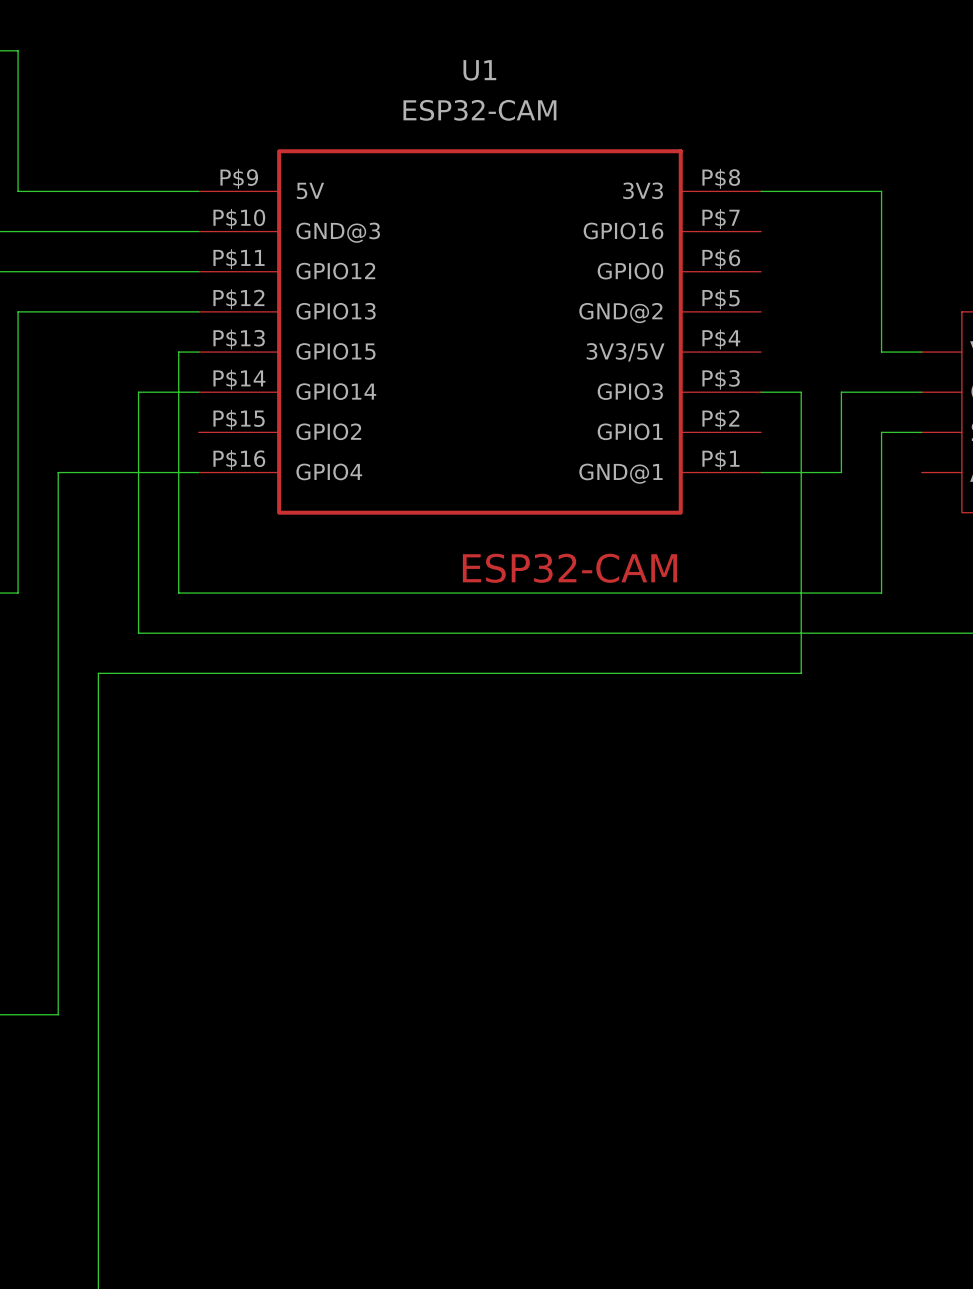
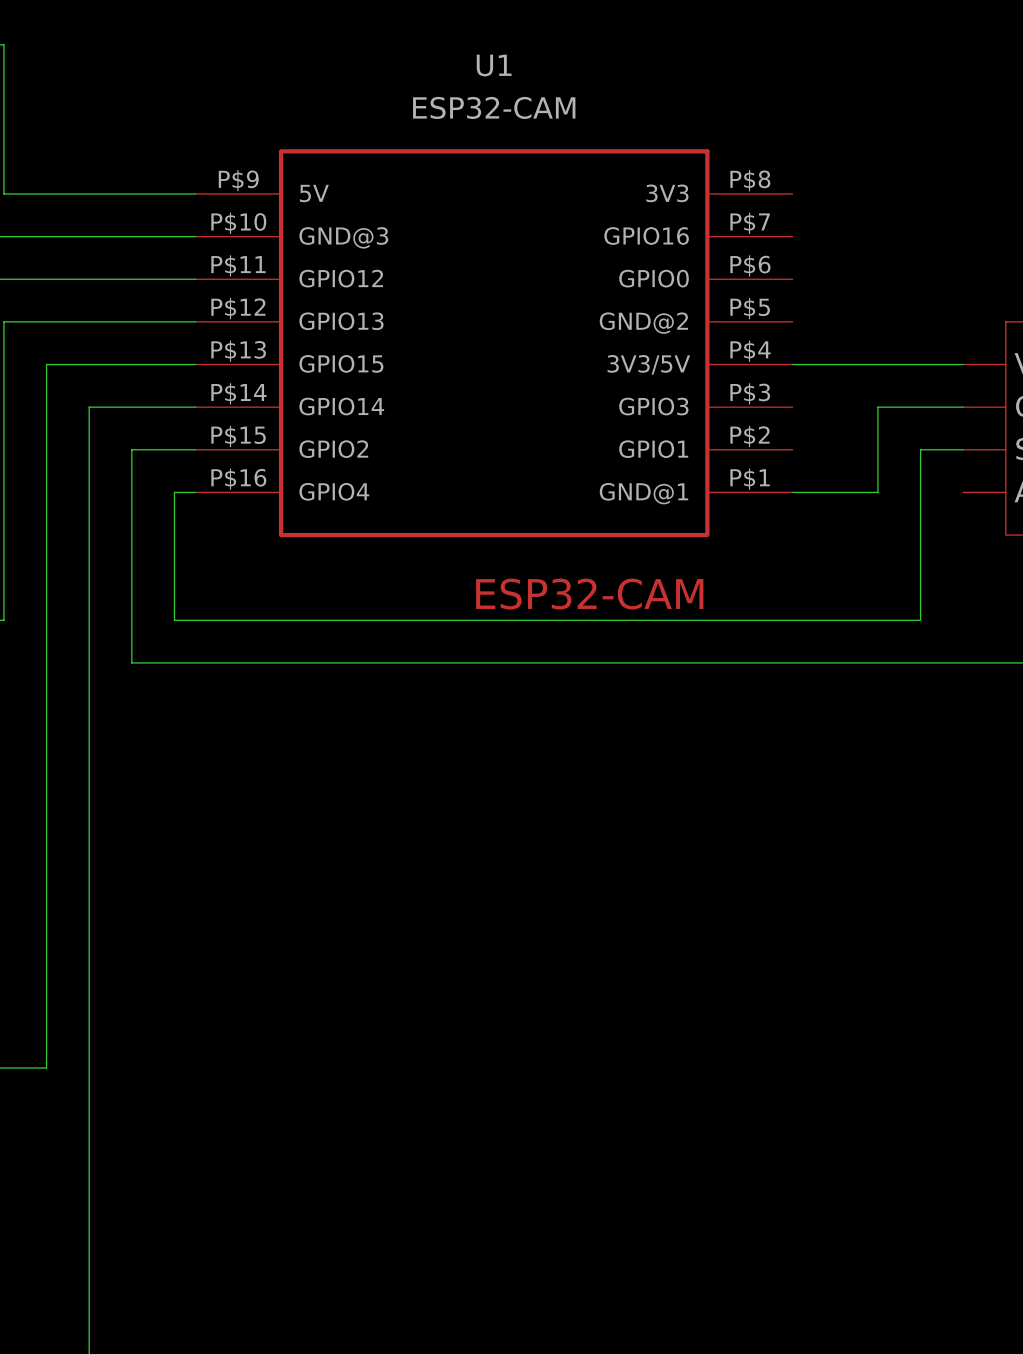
wire: (761, 191) (881, 191) (881, 352) -> (792, 364) (920, 364)
wire: (178, 352) (178, 472) (58, 472) -> (174, 364) (46, 364) (46, 492)
wire: (138, 392) (138, 432) -> (195, 449) (131, 449)
wire: (761, 392) (801, 392) (801, 673) (98, 673) -> (131, 407) (89, 407) (89, 705)

